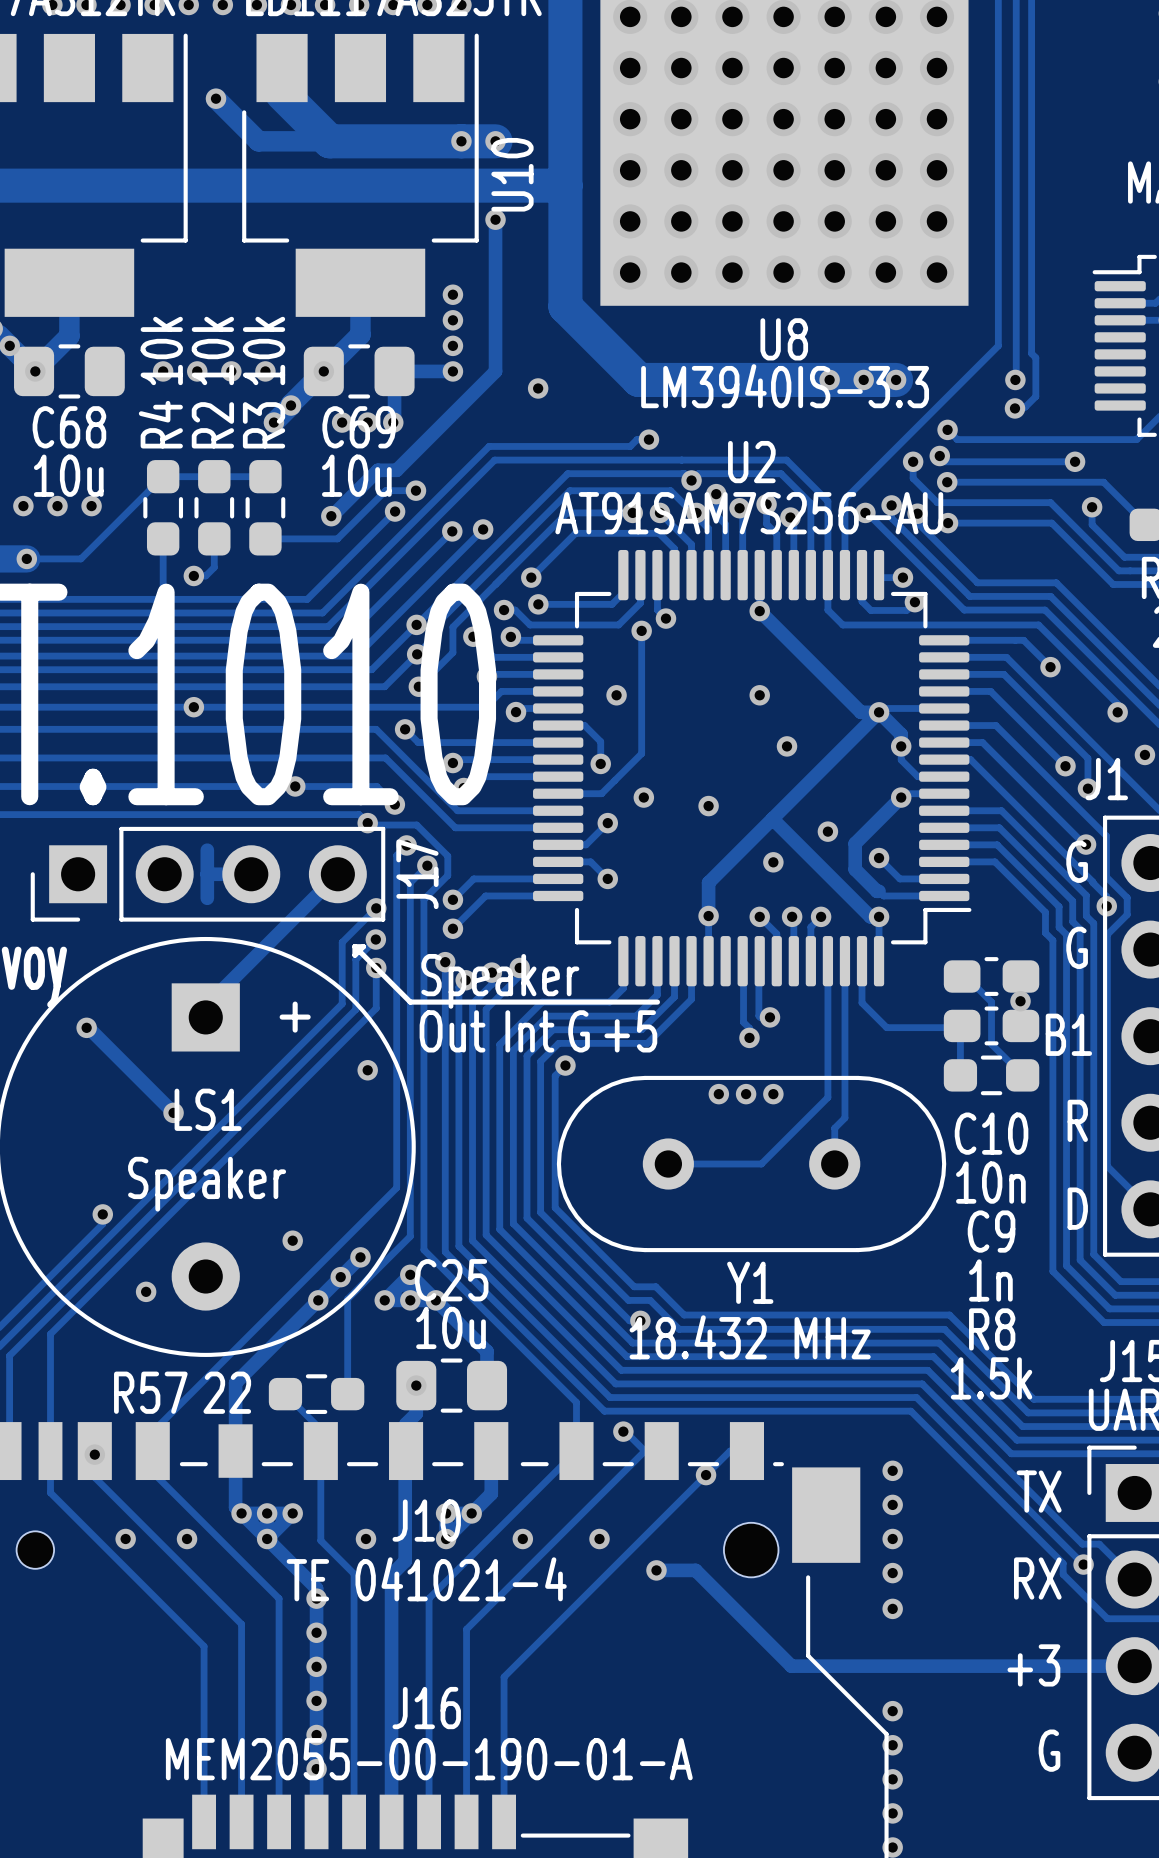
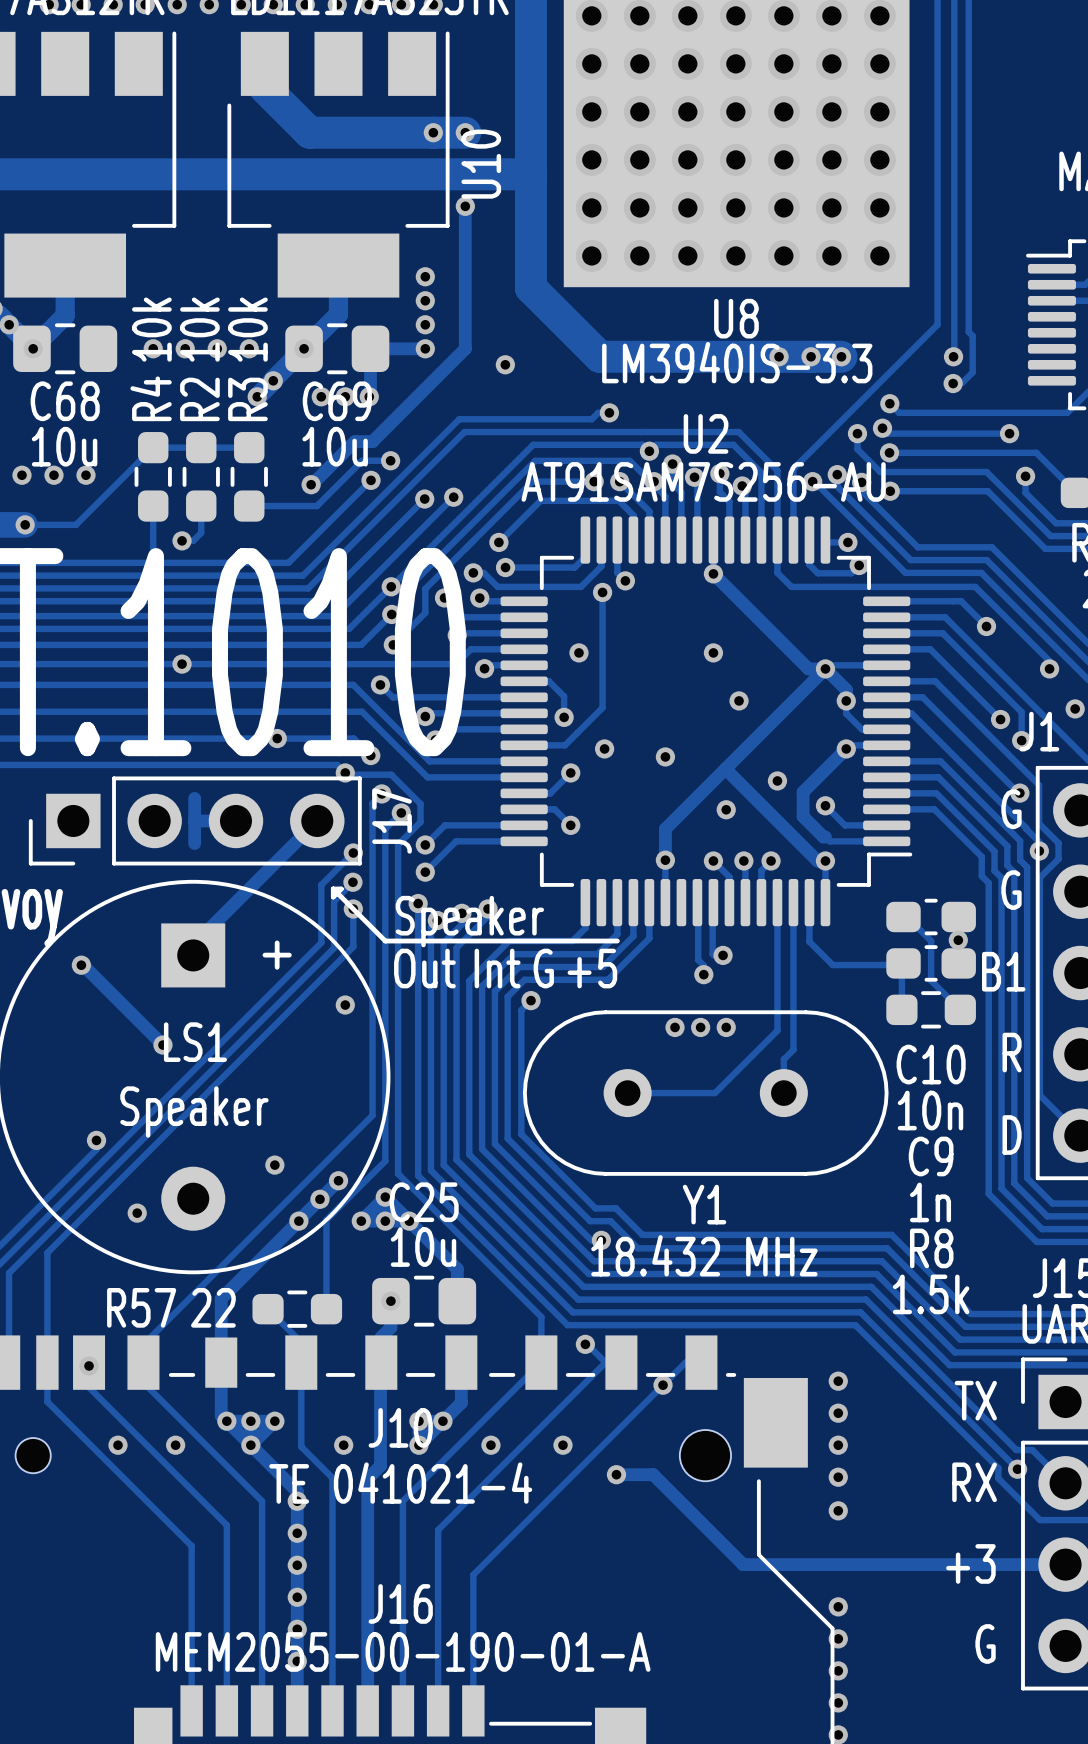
track: (216, 98) (258, 141) (329, 141) -> none
via: (216, 98) -> none

